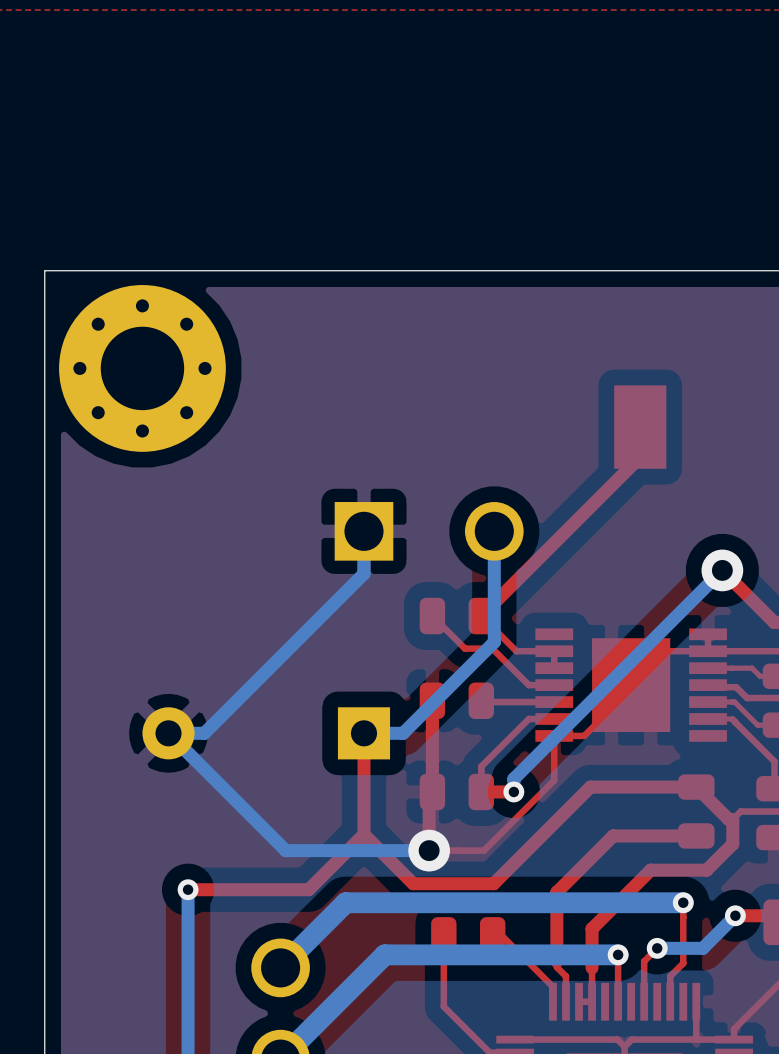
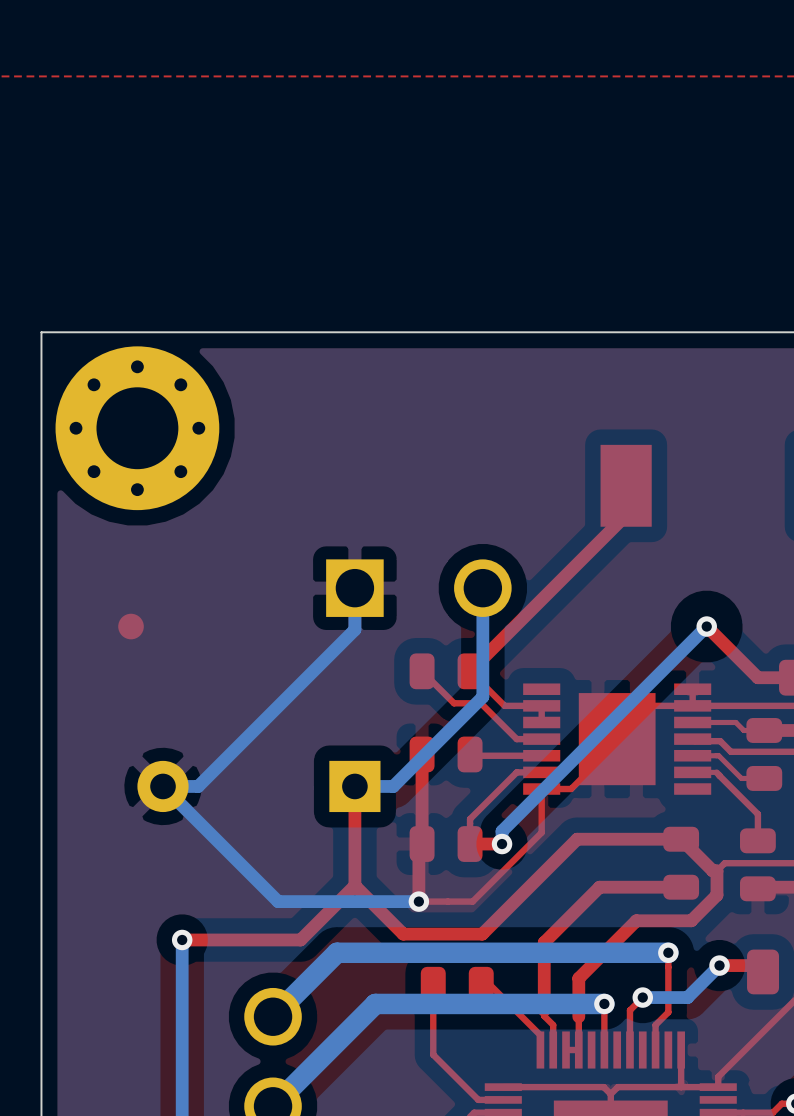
via size: [701, 549, 744, 592] -> [696, 616, 717, 637]
part: none -> (131, 626)
via size: [408, 829, 451, 872] -> [408, 891, 430, 912]

